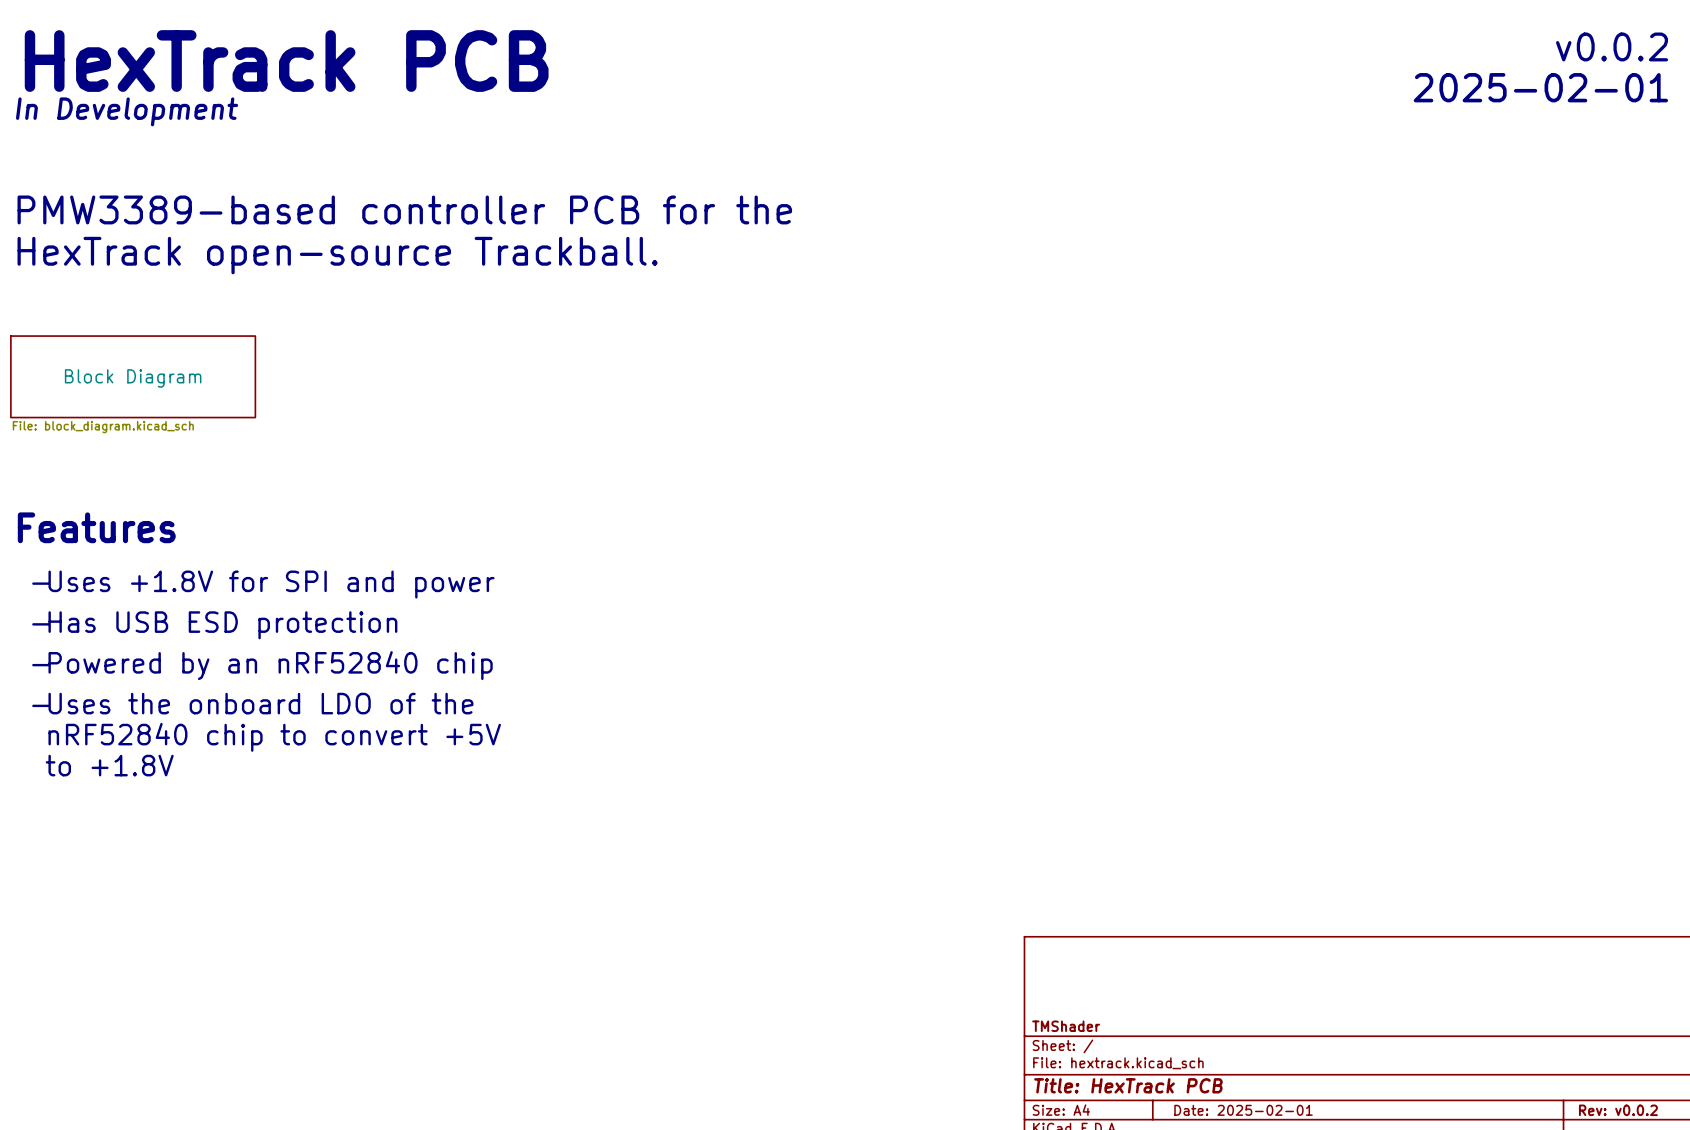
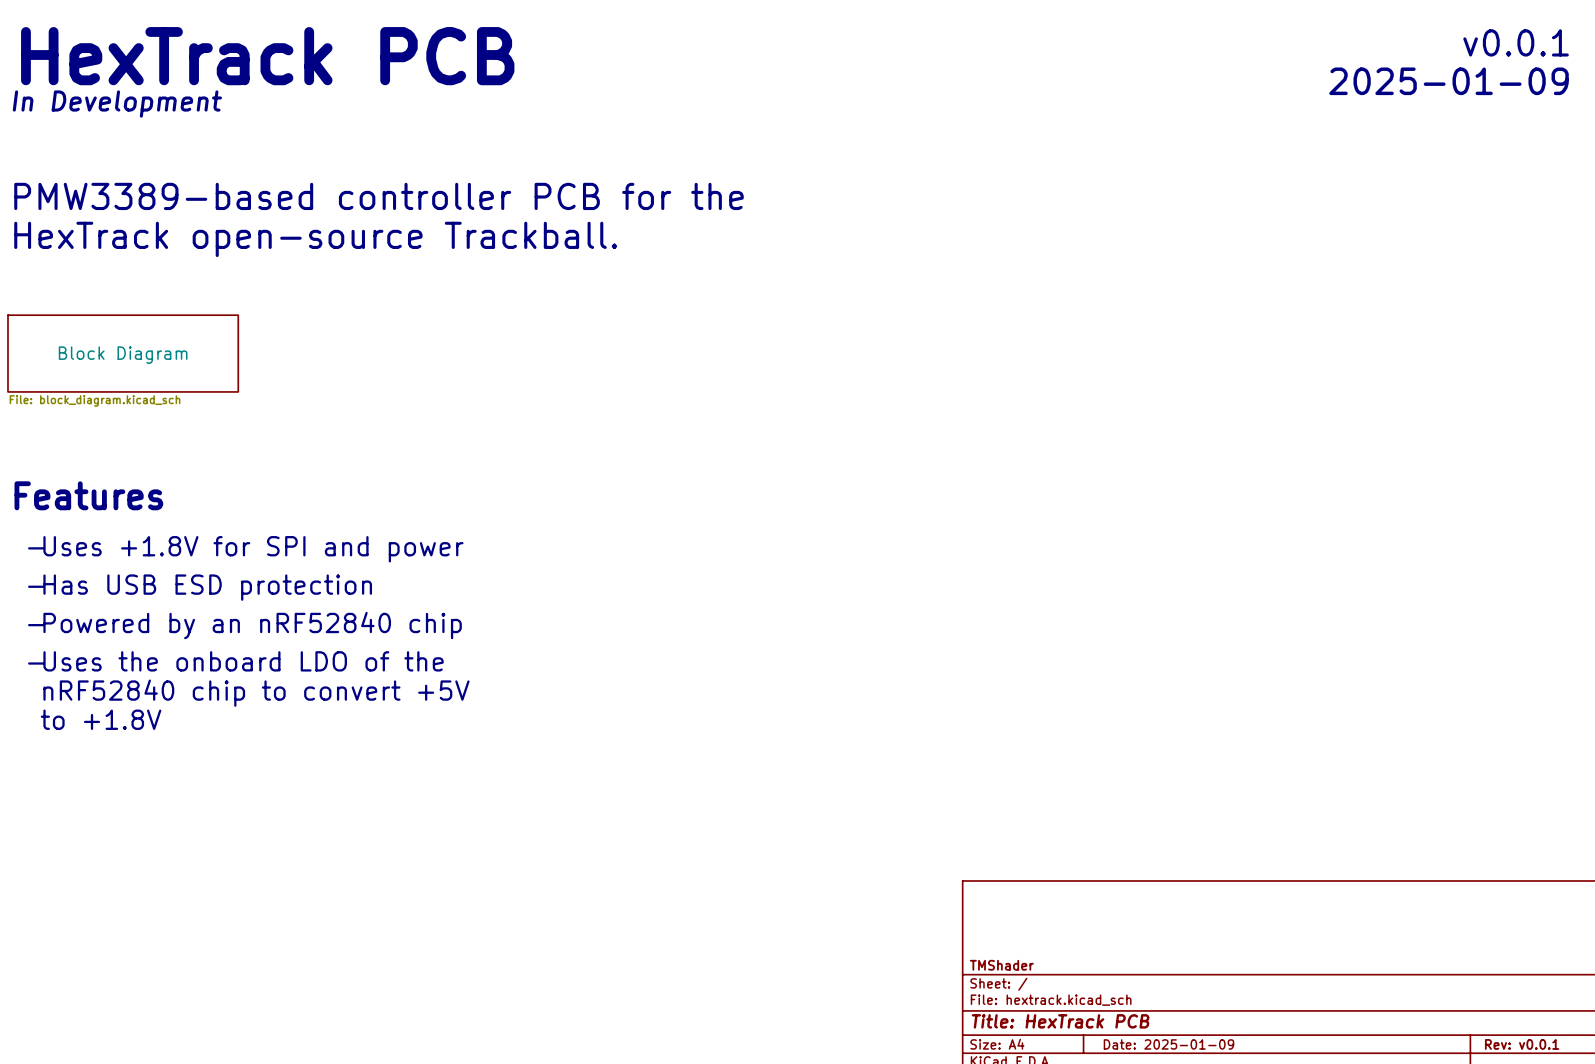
text: v0.0.2 (1612, 46) -> v0.0.1 (1516, 42)
text: 2025-02-01 (1540, 87) -> 2025-01-09 (1449, 81)
title block: Date: 2025-02-01 (1243, 1110) -> Date: 2025-01-09 (1168, 1044)
title block: Rev: v0.0.2 (1618, 1110) -> Rev: v0.0.1 (1522, 1044)

